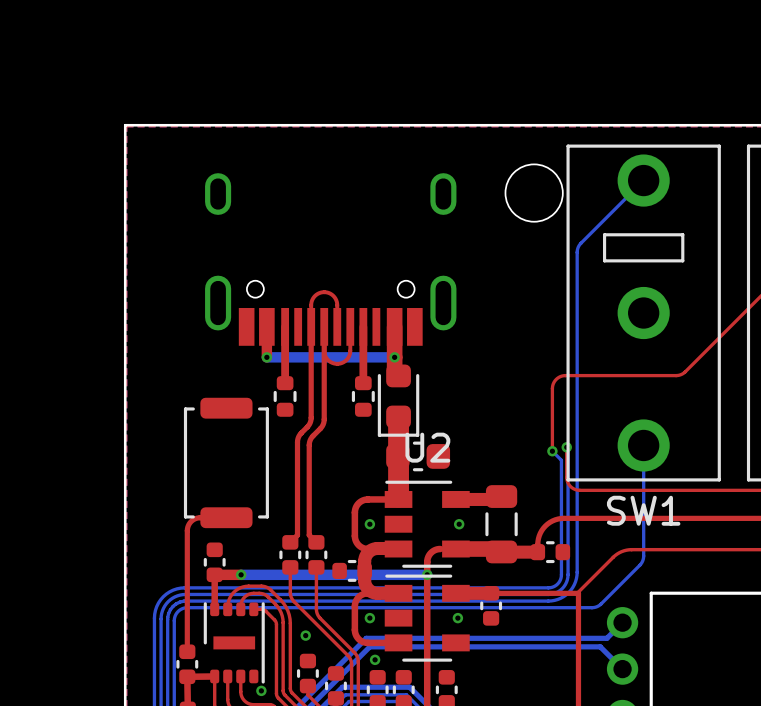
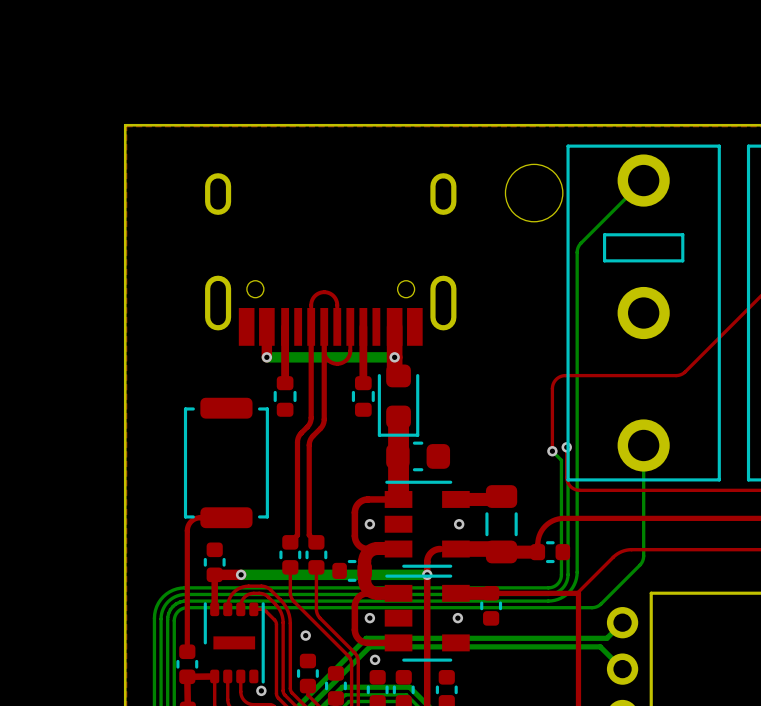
U2 name: U2 (427, 447) -> none
SW1 name: SW1 (643, 510) -> none

